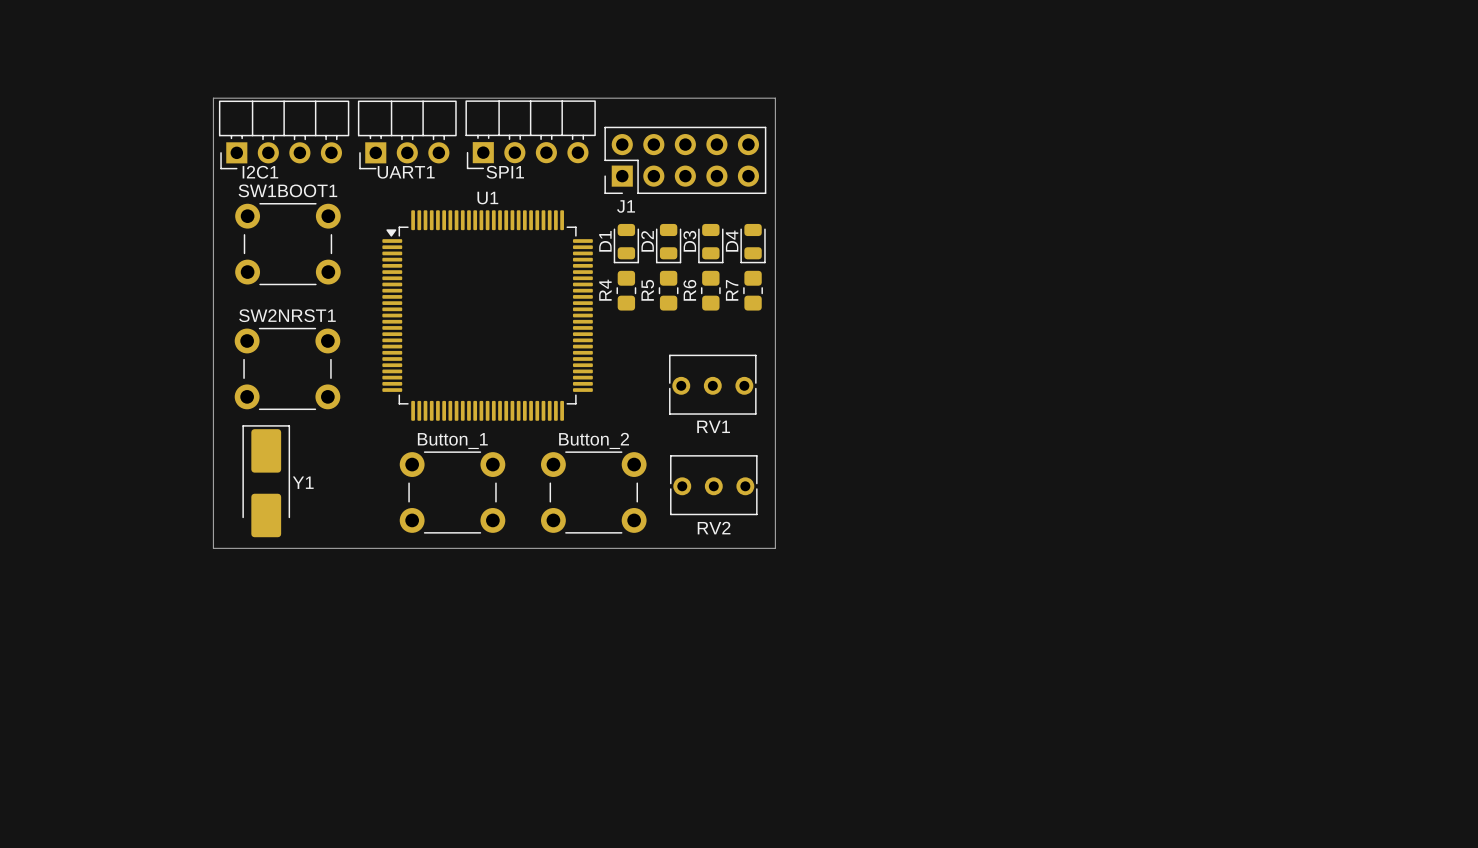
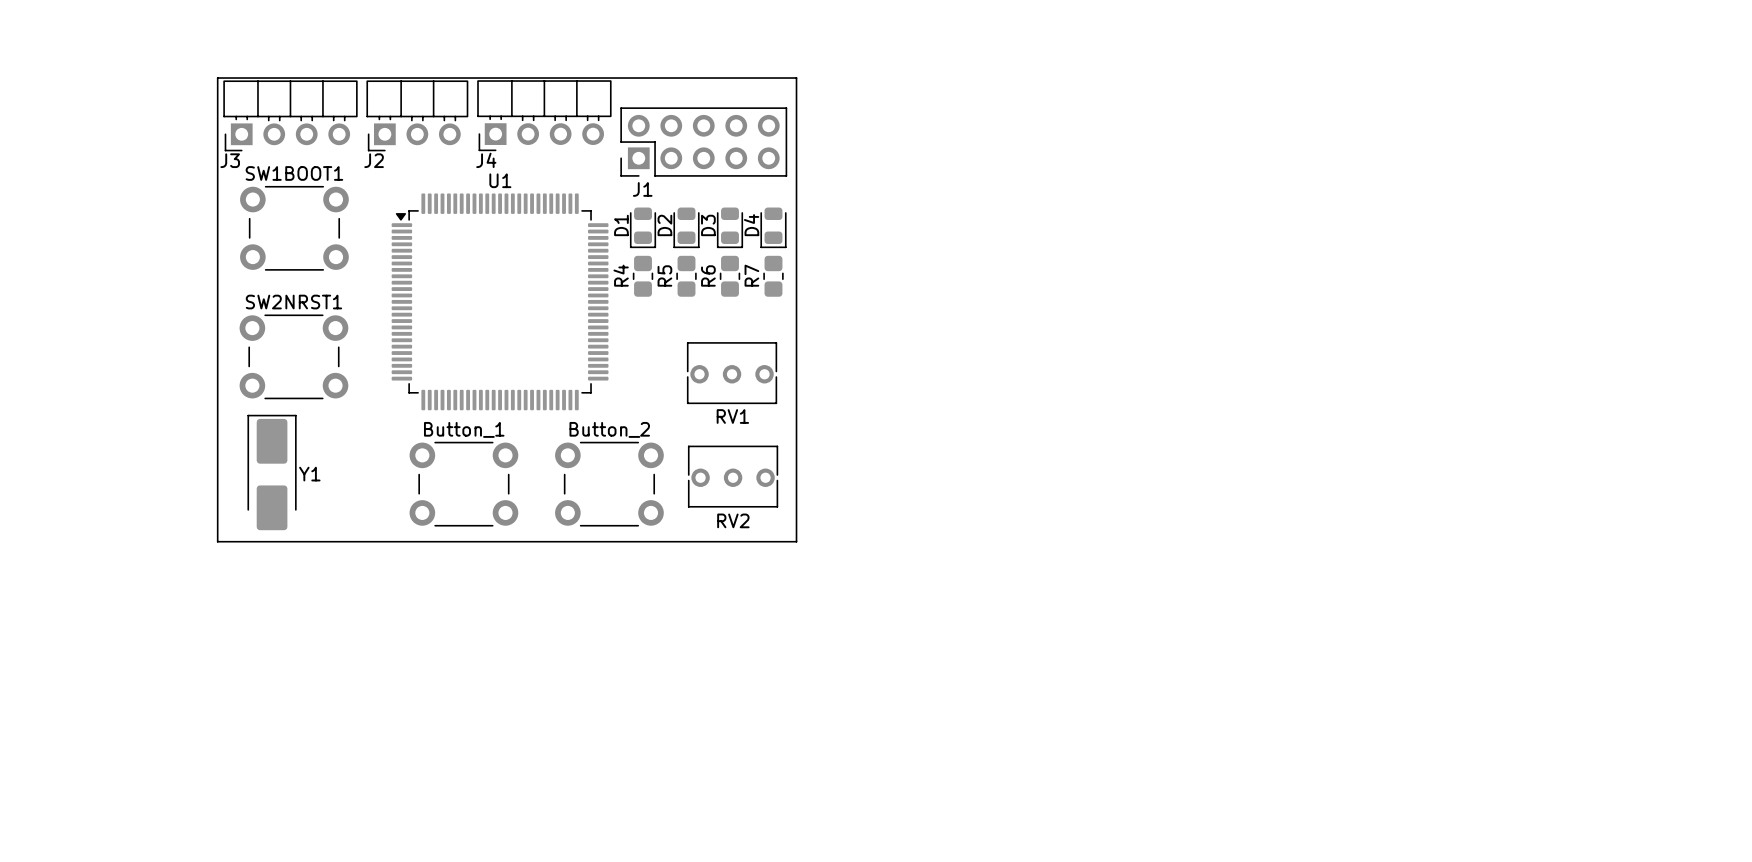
I2C1 name: I2C1 (260, 172) -> J3 (230, 160)
UART1 name: UART1 (406, 172) -> J2 (374, 160)
SPI1 name: SPI1 (505, 172) -> J4 (486, 160)

